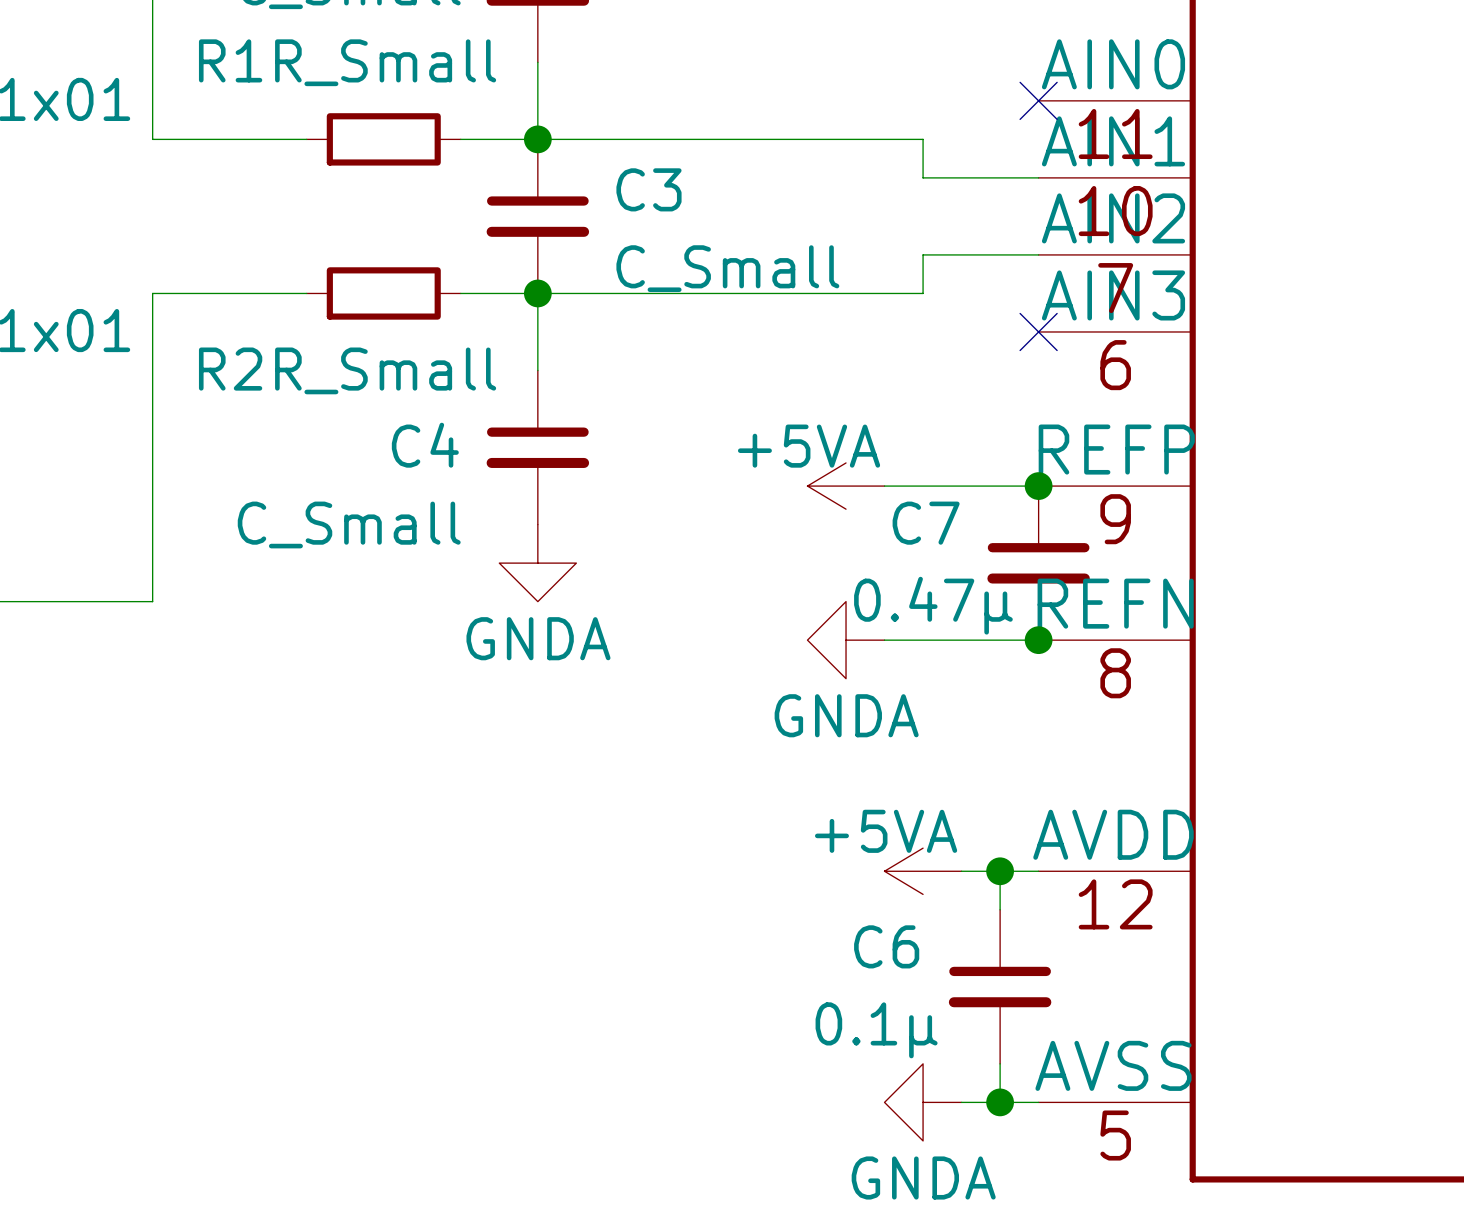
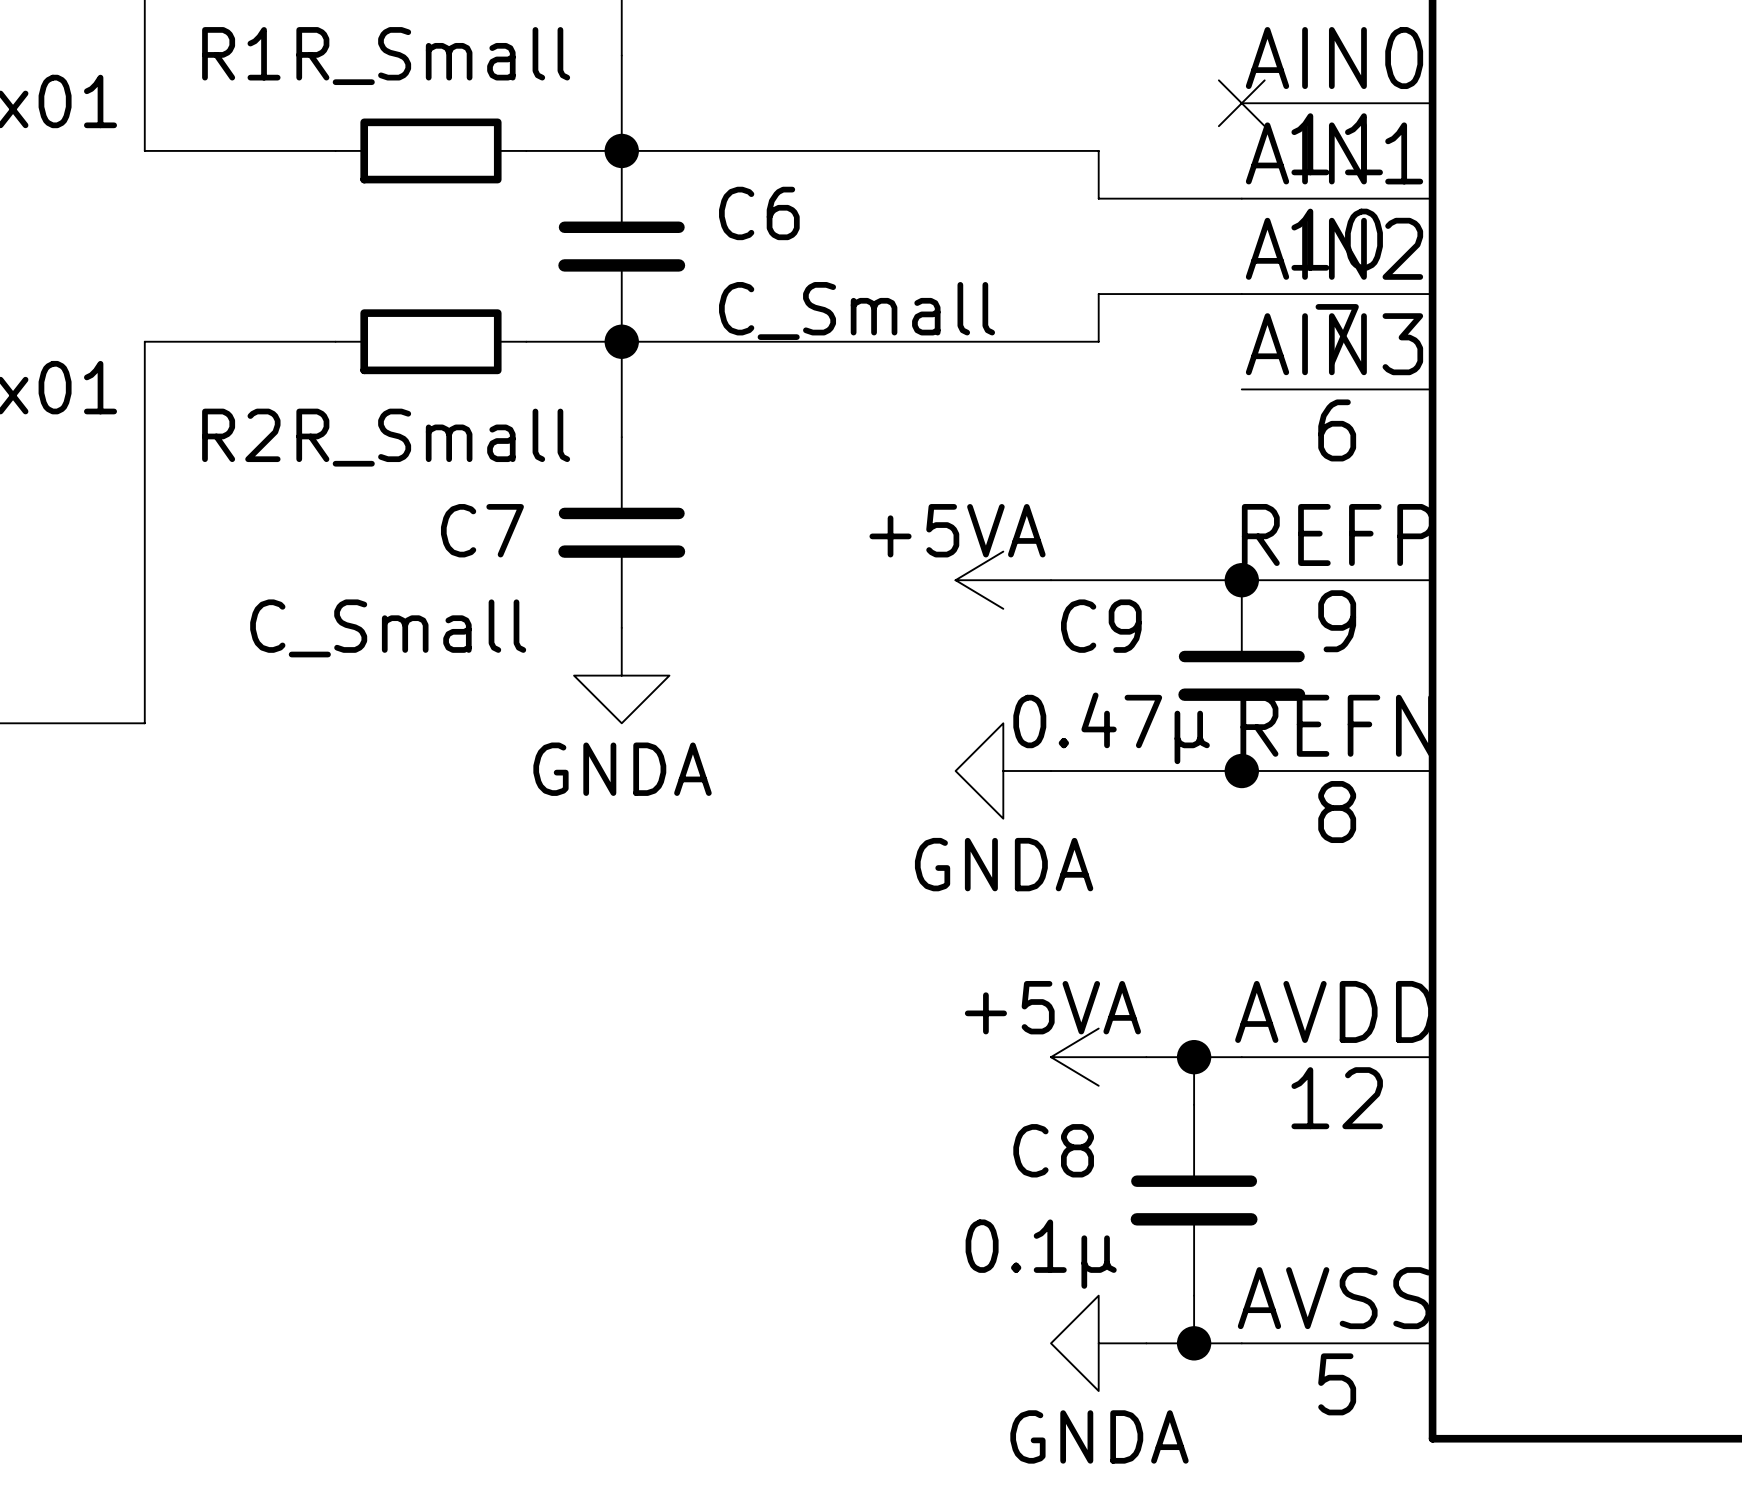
C3 name: C3 (648, 189) -> C6 (759, 213)
no-connect mark: (1038, 331) -> none
C4 name: C4 (425, 445) -> C7 (482, 530)
C7 name: C7 (926, 523) -> C9 (1101, 626)
C6 name: C6 (886, 946) -> C8 (1053, 1150)

